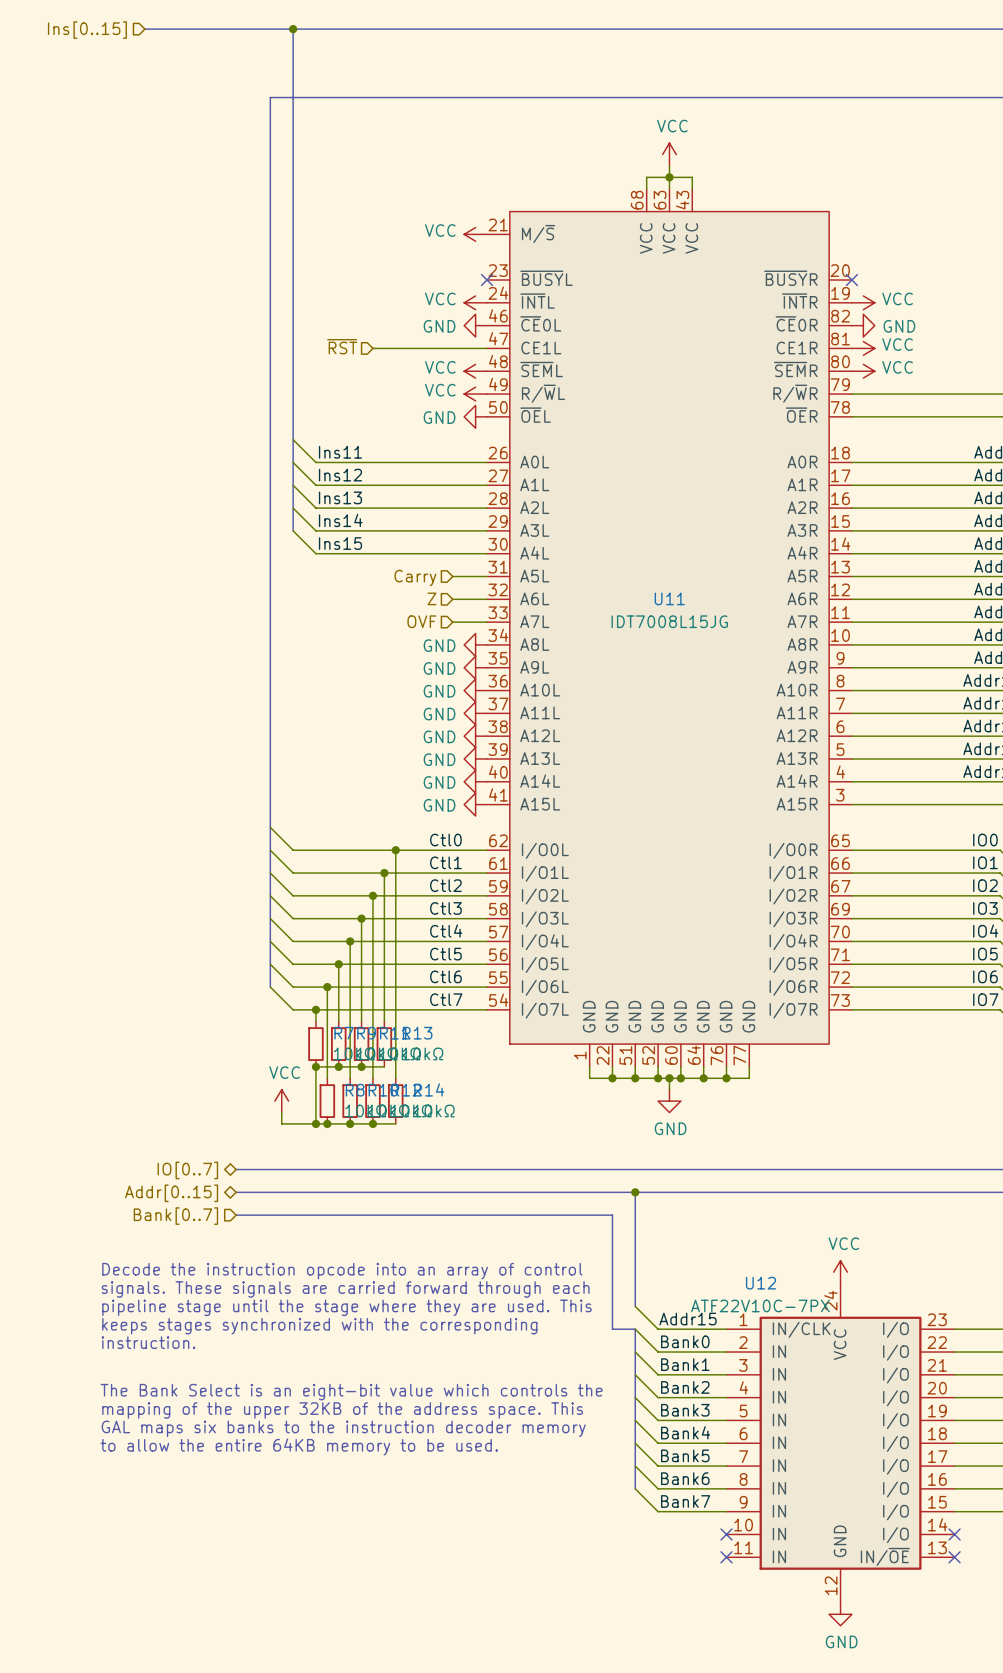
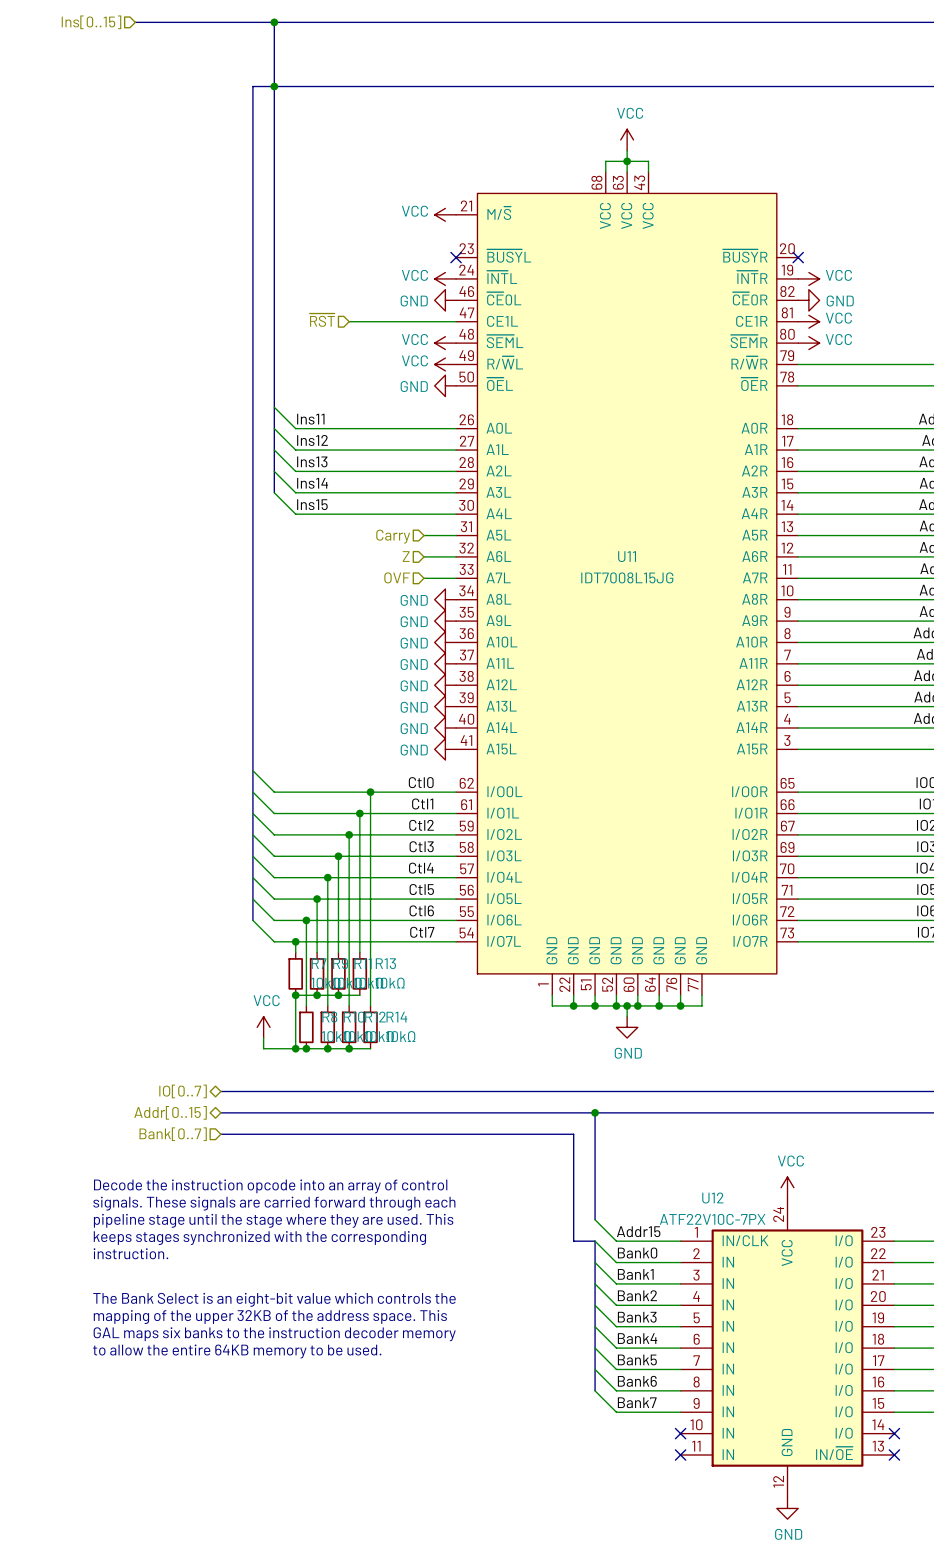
junction: none -> (274, 86)

